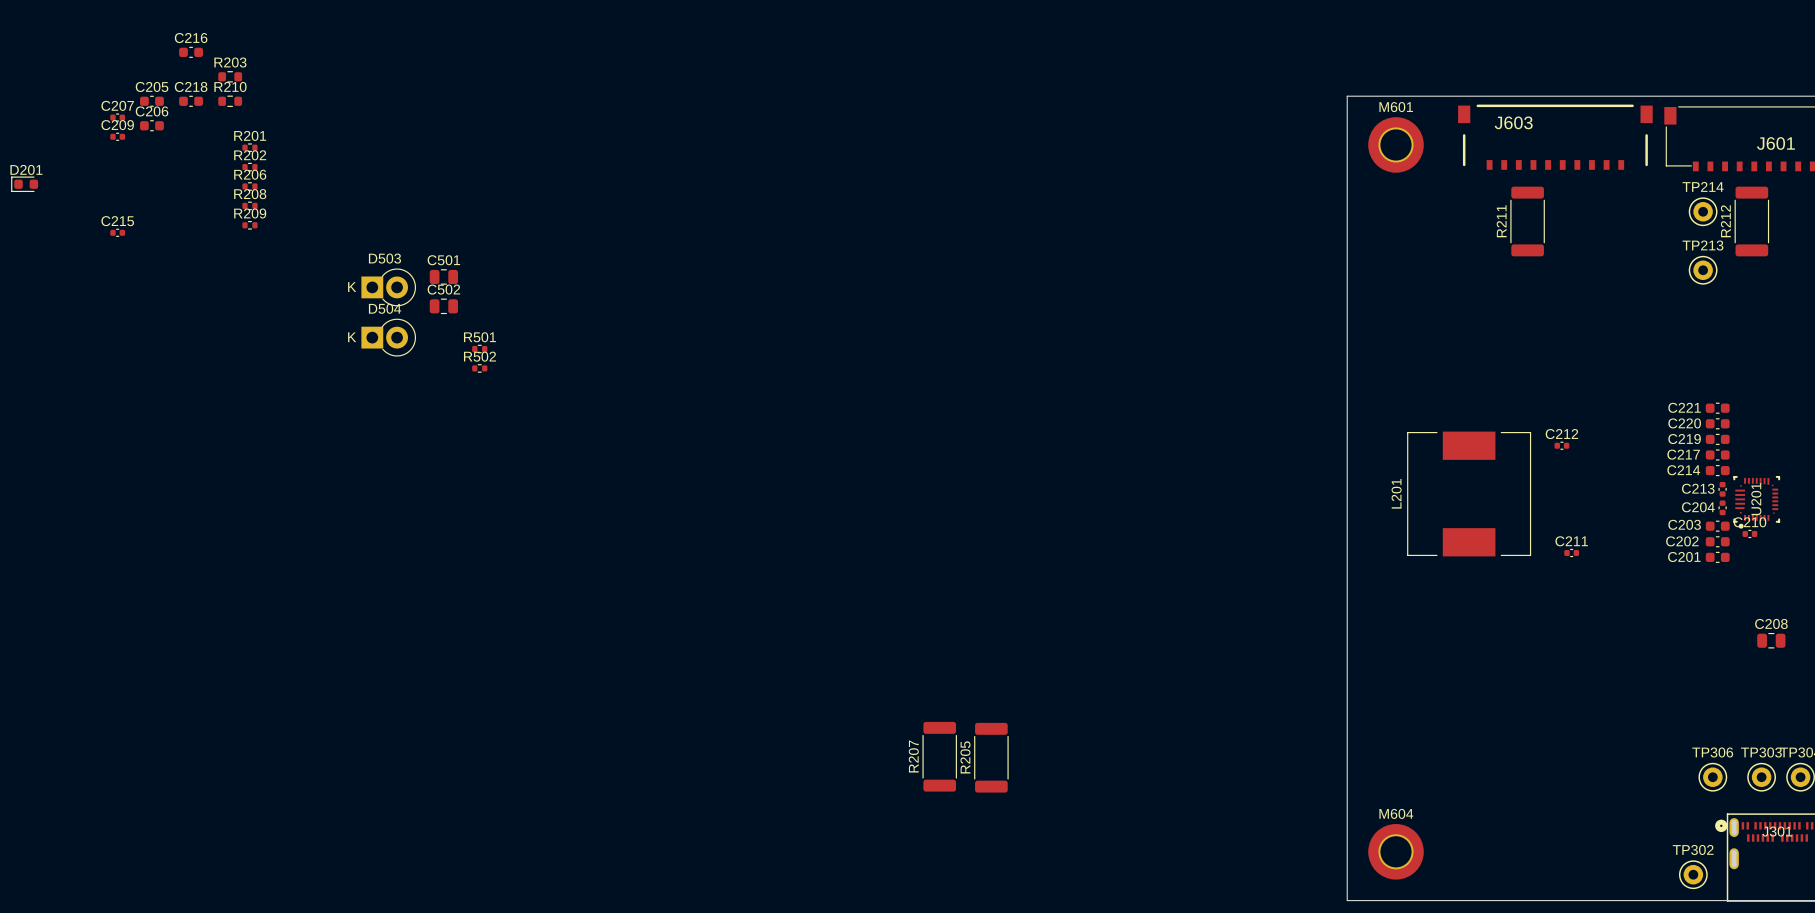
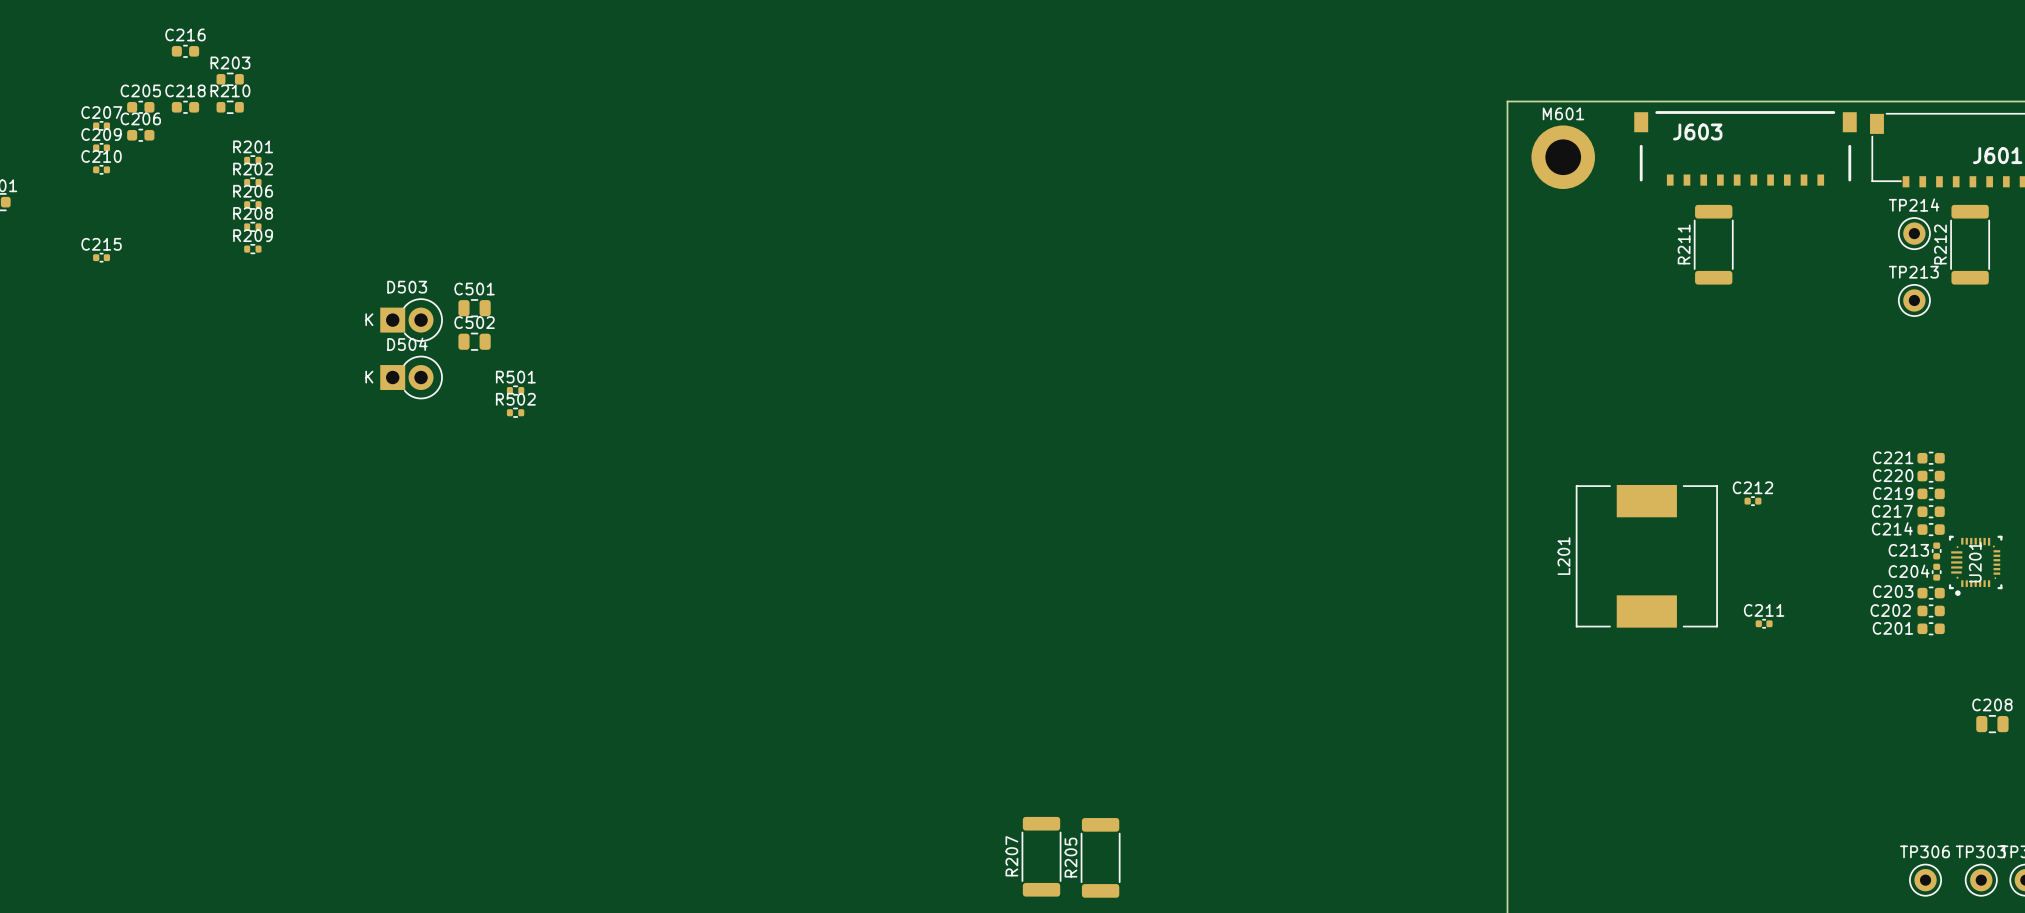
C210 position: (1749, 533) -> (101, 169)

